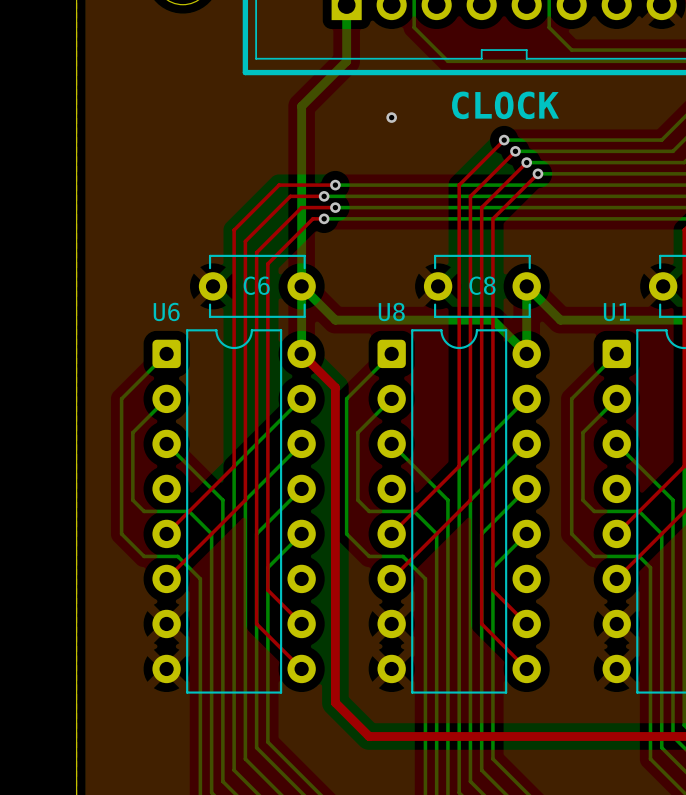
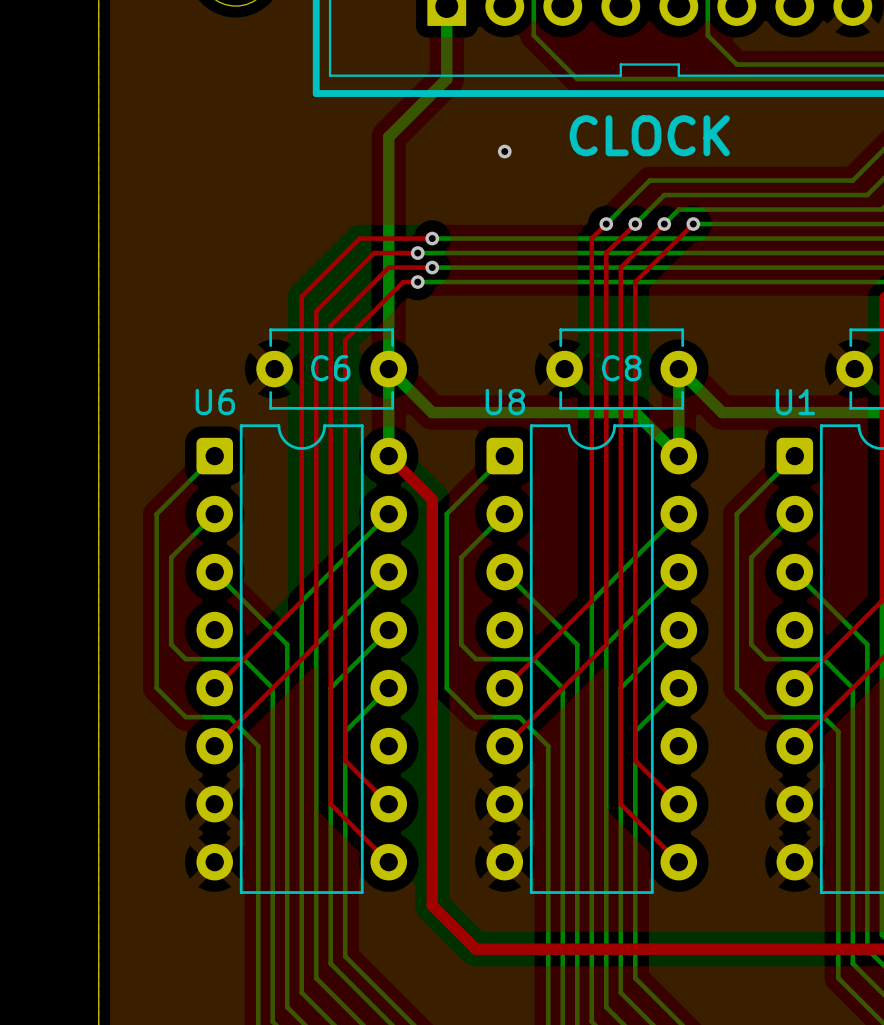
top track: (504, 140) (470, 173) -> none
bottom track: none -> (649, 180) (606, 224)
via: (504, 140) -> none
top track: (515, 151) (492, 173) -> none
bottom track: none -> (664, 195) (635, 224)
via: (515, 151) -> none
top track: (526, 162) (515, 173) -> none
bottom track: none -> (678, 209) (664, 224)
via: (526, 162) -> none
via: none -> (606, 224)
via: none -> (635, 224)
via: none -> (664, 224)

